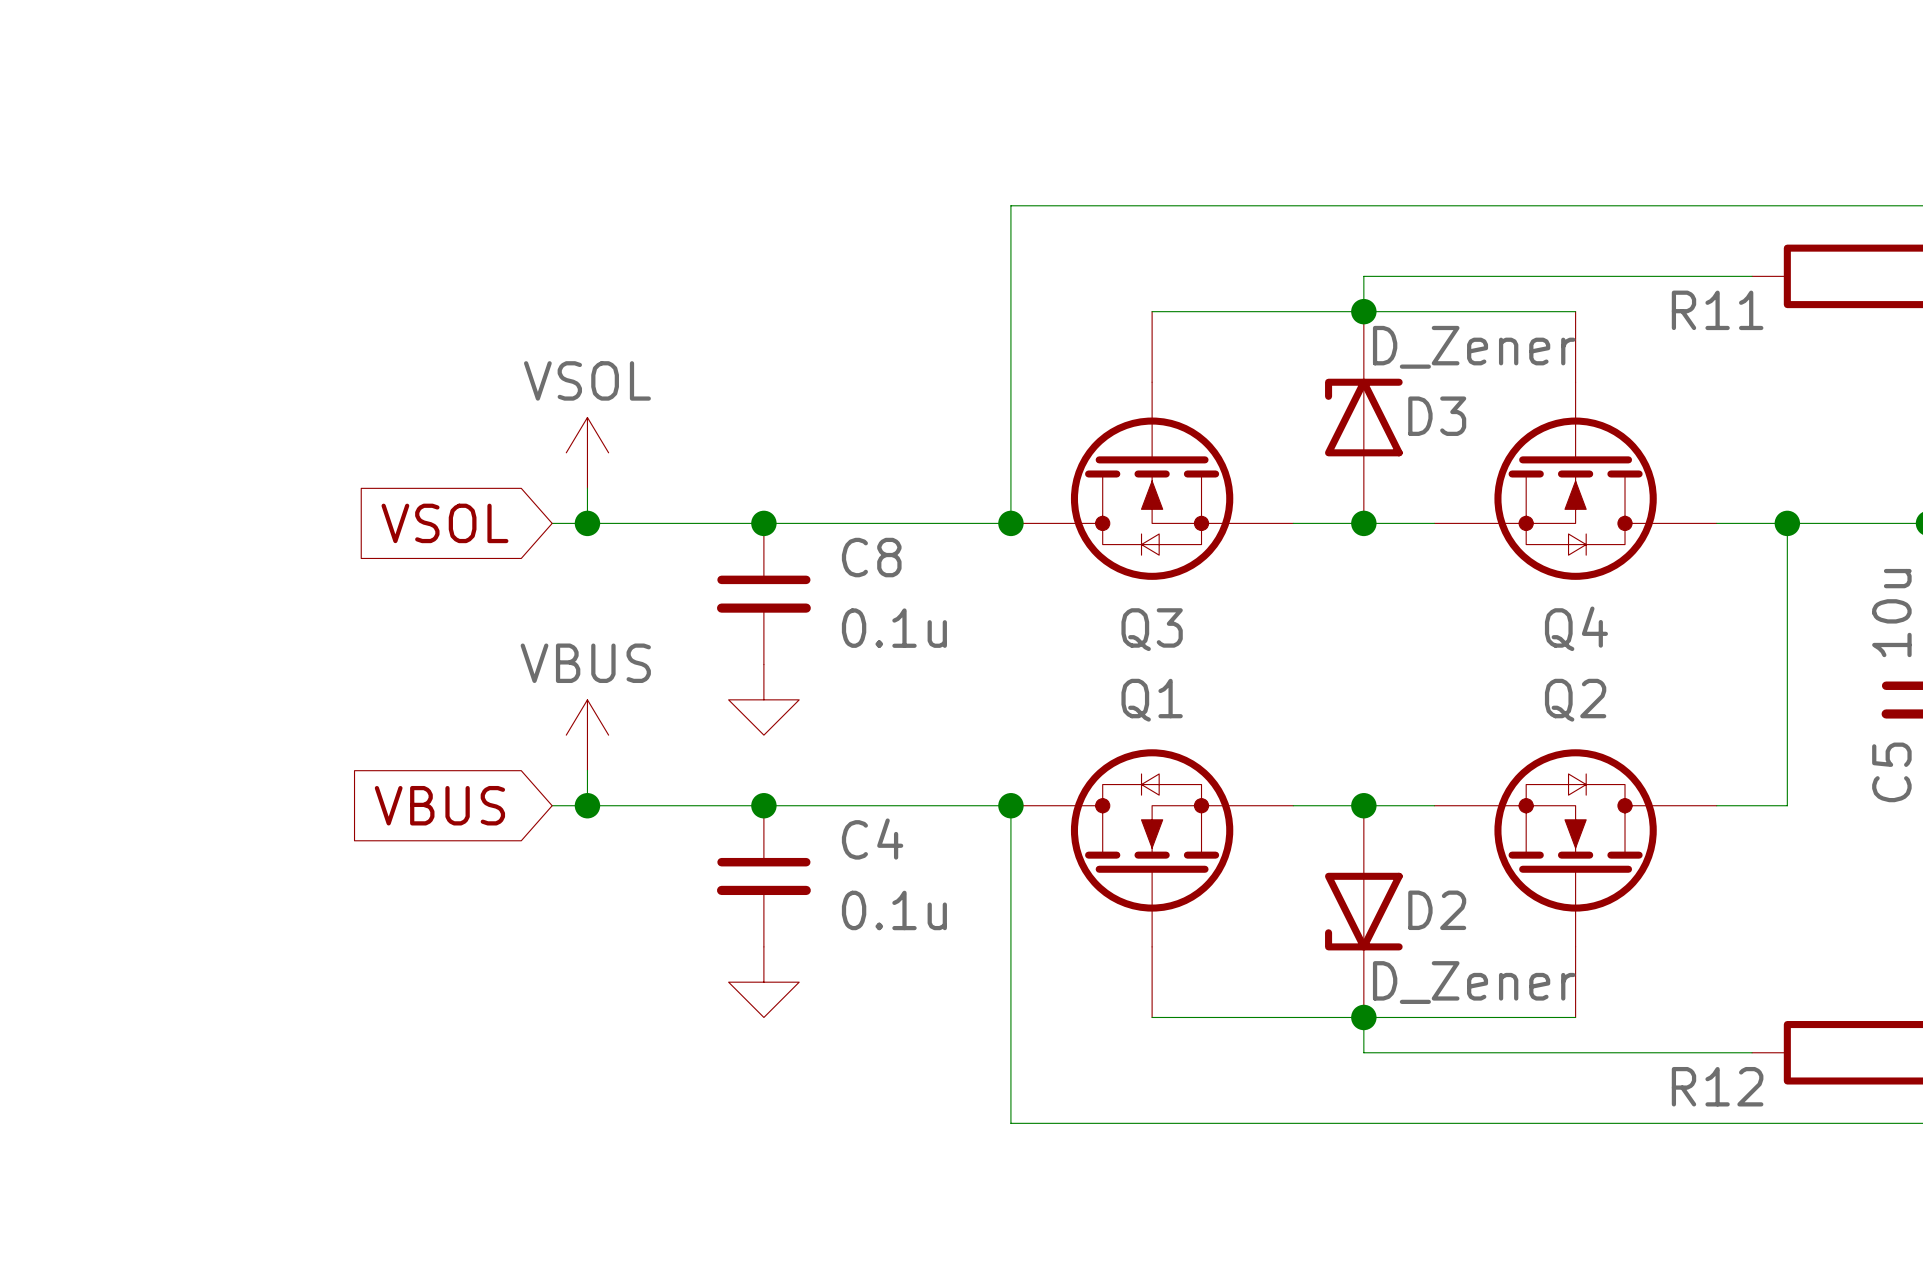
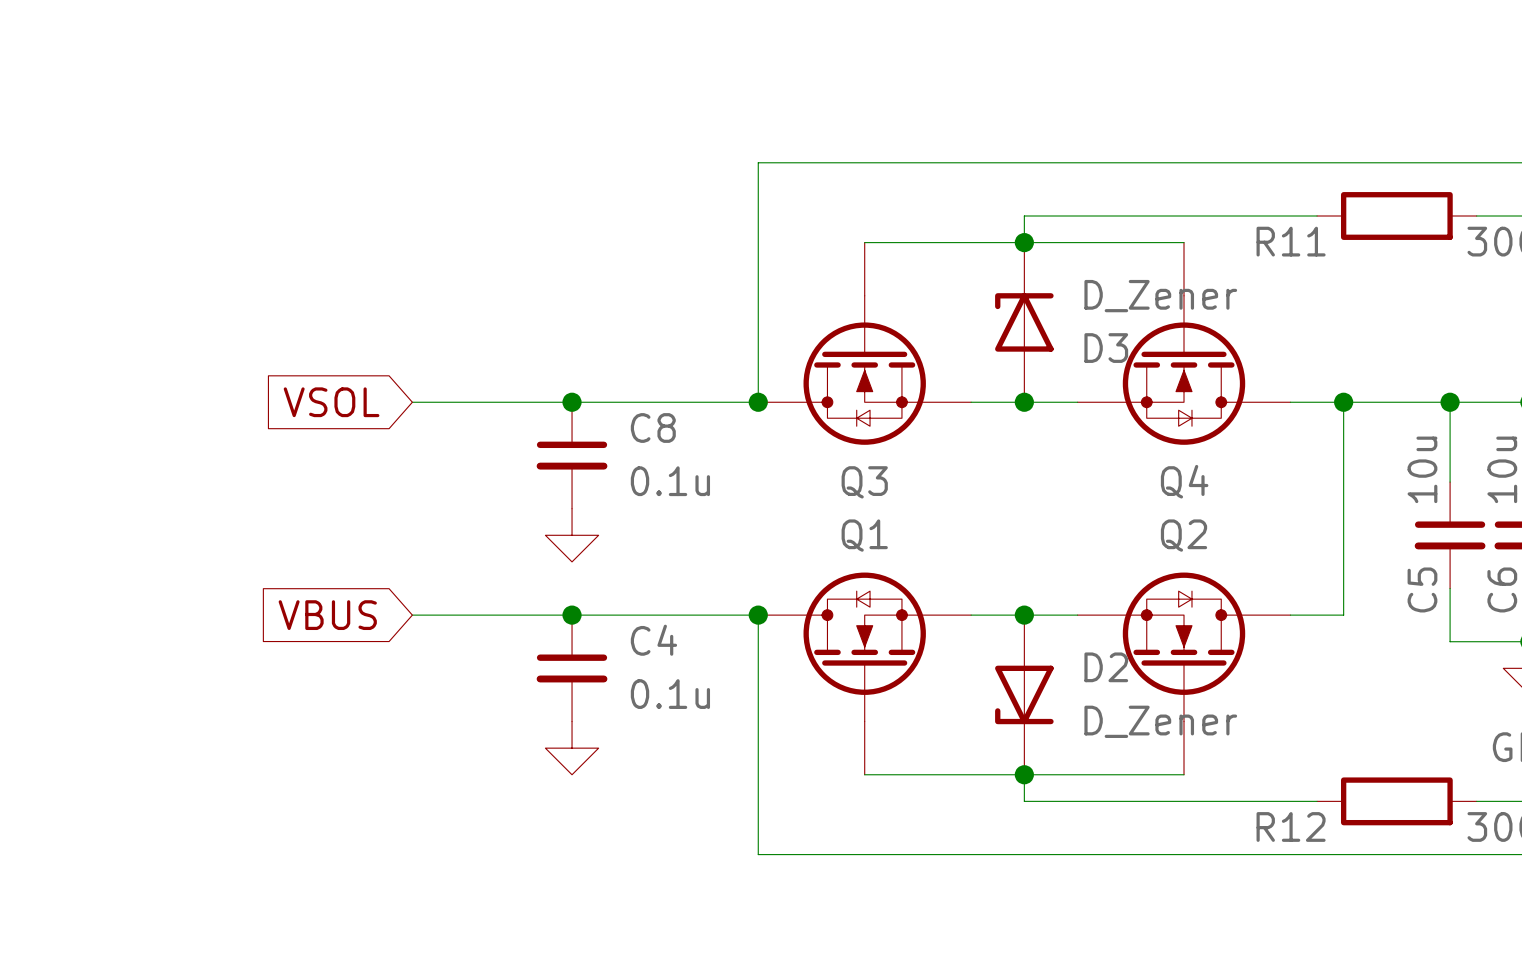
D3 value position: D_Zener (1474, 347) -> D_Zener (1160, 296)
D3 name position: D3 (1437, 416) -> D3 (1106, 348)
power symbol: VSOL (587, 452) -> none
wire: (587, 488) (587, 523) -> none
junction: (587, 523) -> none
power symbol: VBUS (587, 735) -> none
wire: (587, 770) (587, 805) -> none
junction: (587, 805) -> none
D2 name position: D2 (1437, 910) -> D2 (1106, 667)
D2 value position: D_Zener (1474, 982) -> D_Zener (1160, 721)

